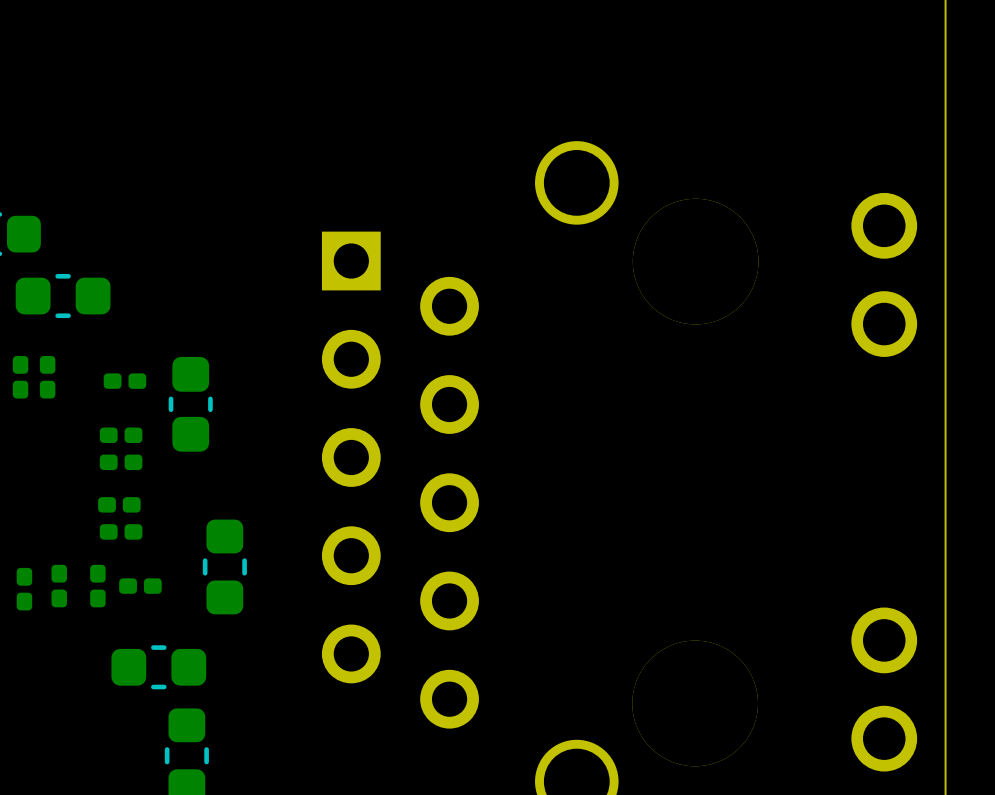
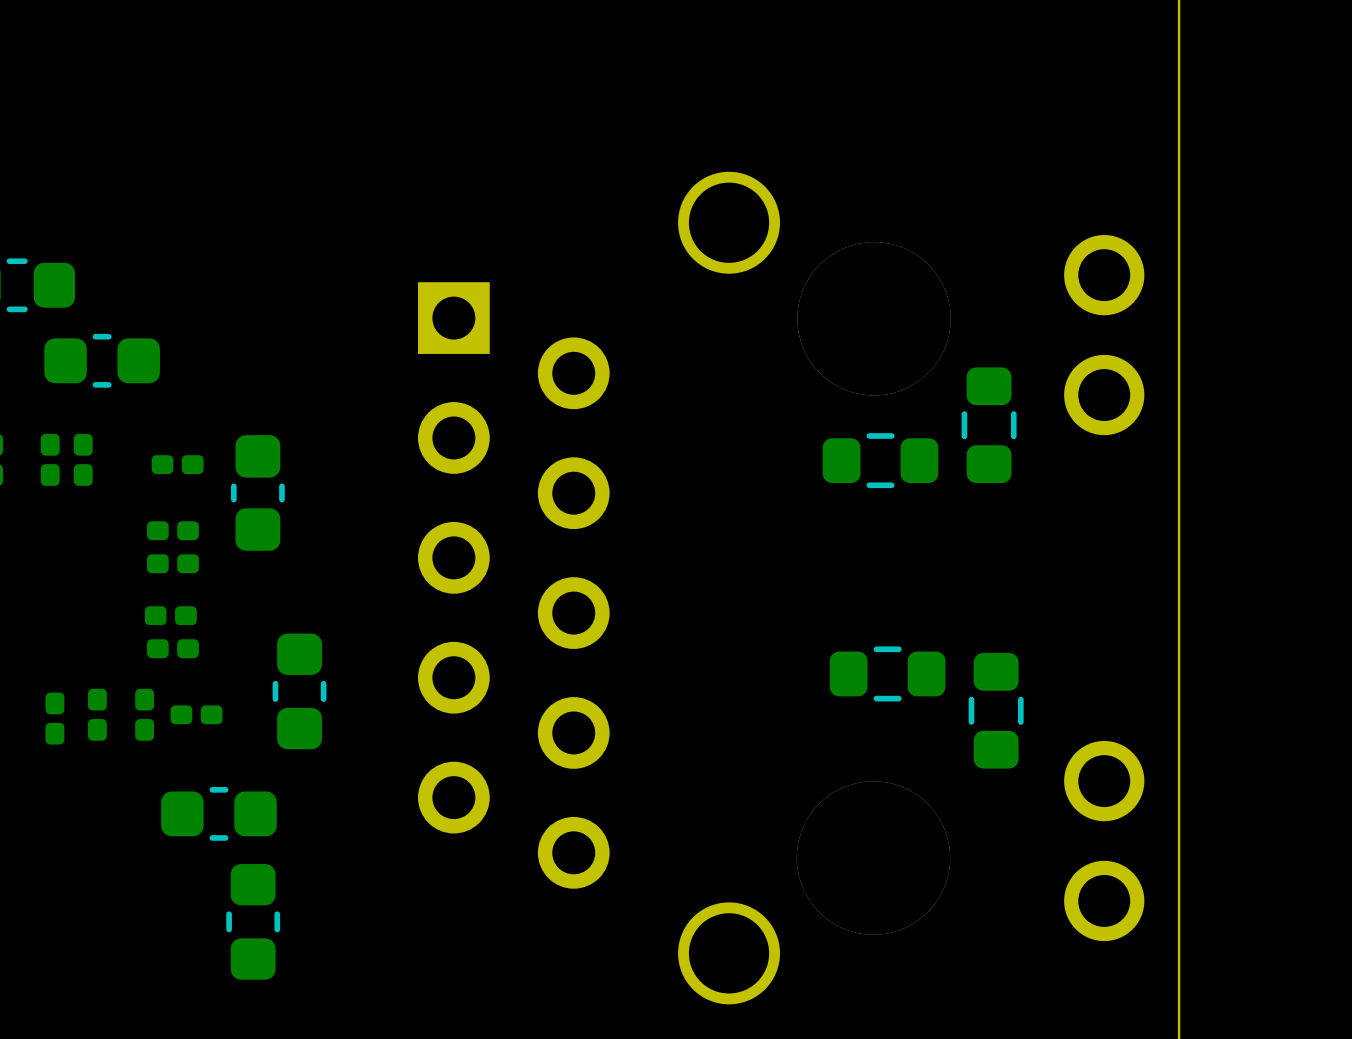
part: none -> (989, 425)
part: none -> (880, 460)
part: none -> (887, 673)
part: none -> (996, 710)

